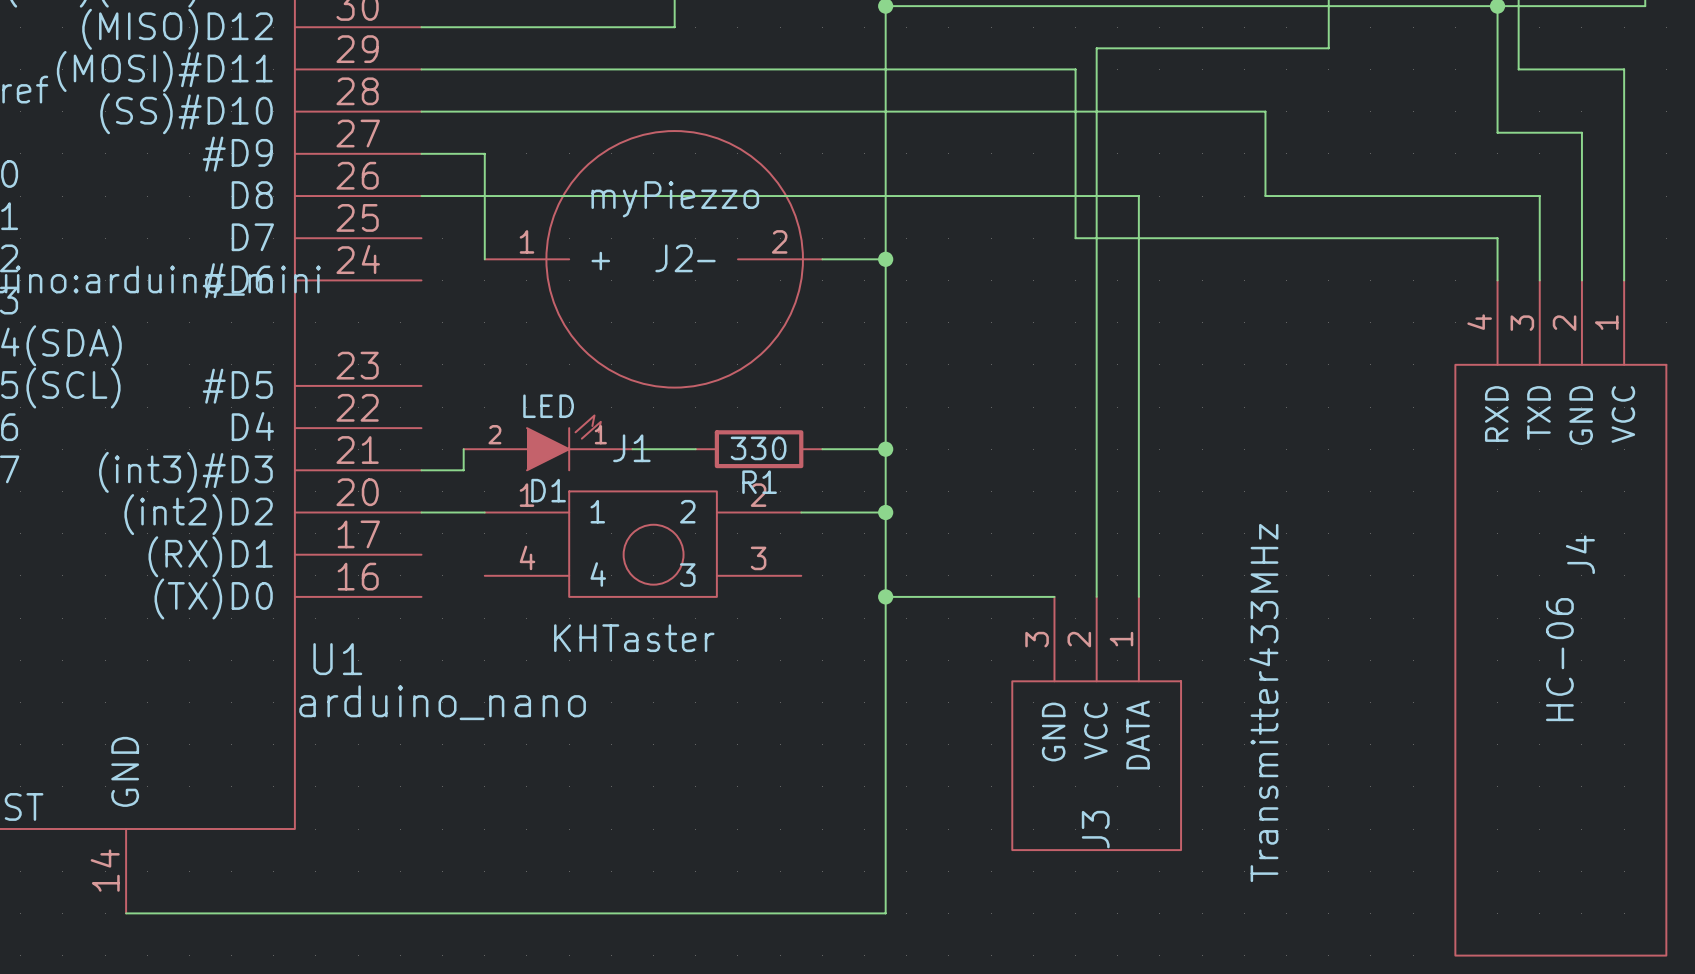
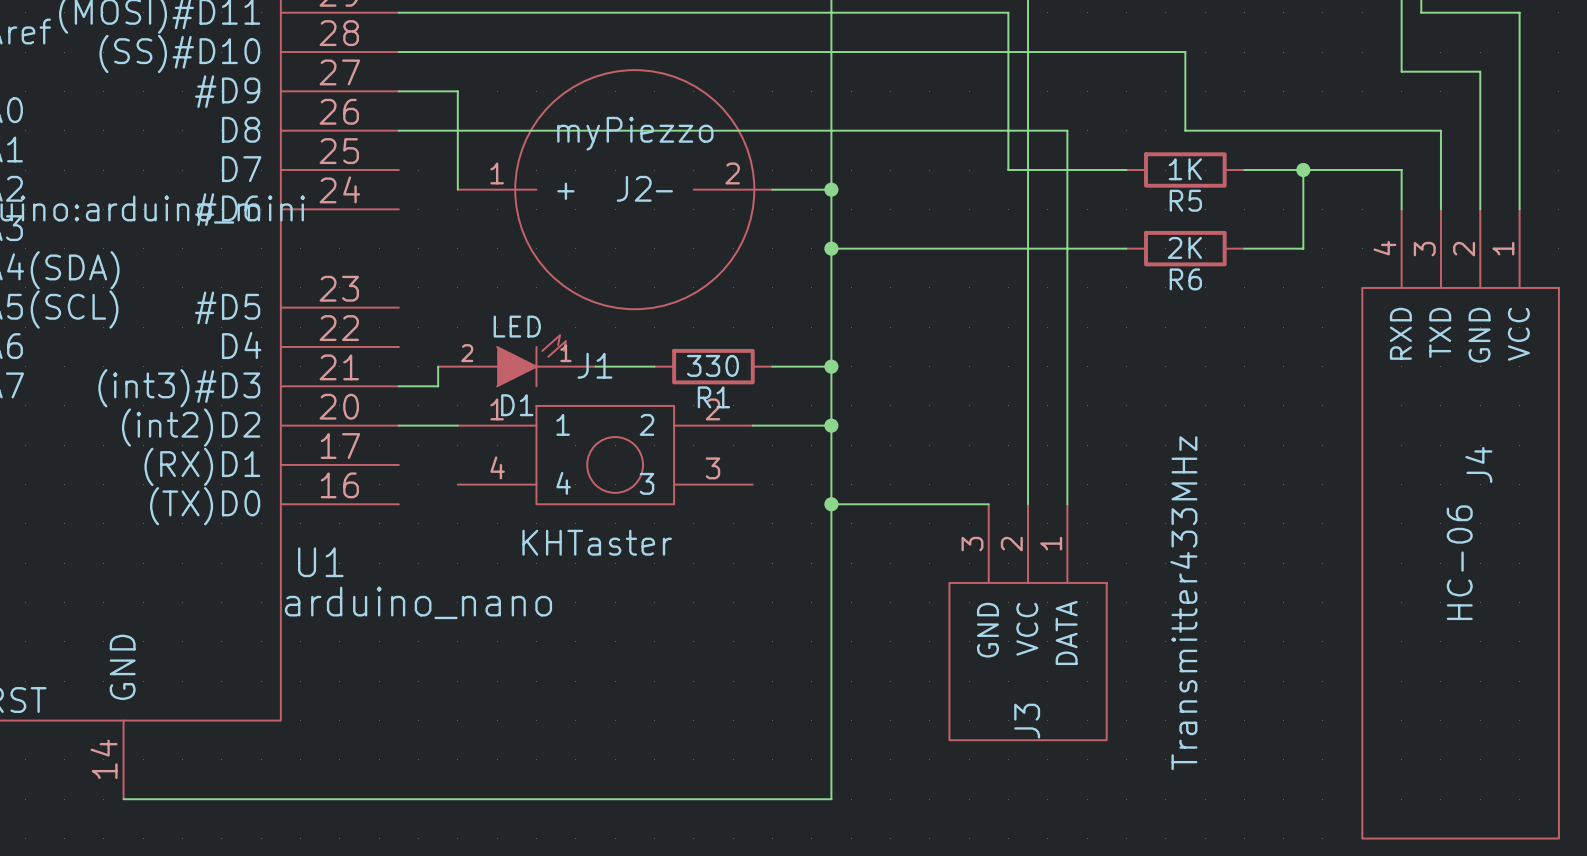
wire: (1202, 238) (1328, 238) -> none
R5: none -> 1K (1185, 170)
wire: none -> (1303, 170) (1303, 248) (1244, 248)
junction: none -> (1303, 170)
wire: none -> (831, 248) (1126, 248)
junction: none -> (831, 248)
R6: none -> 2K (1185, 248)

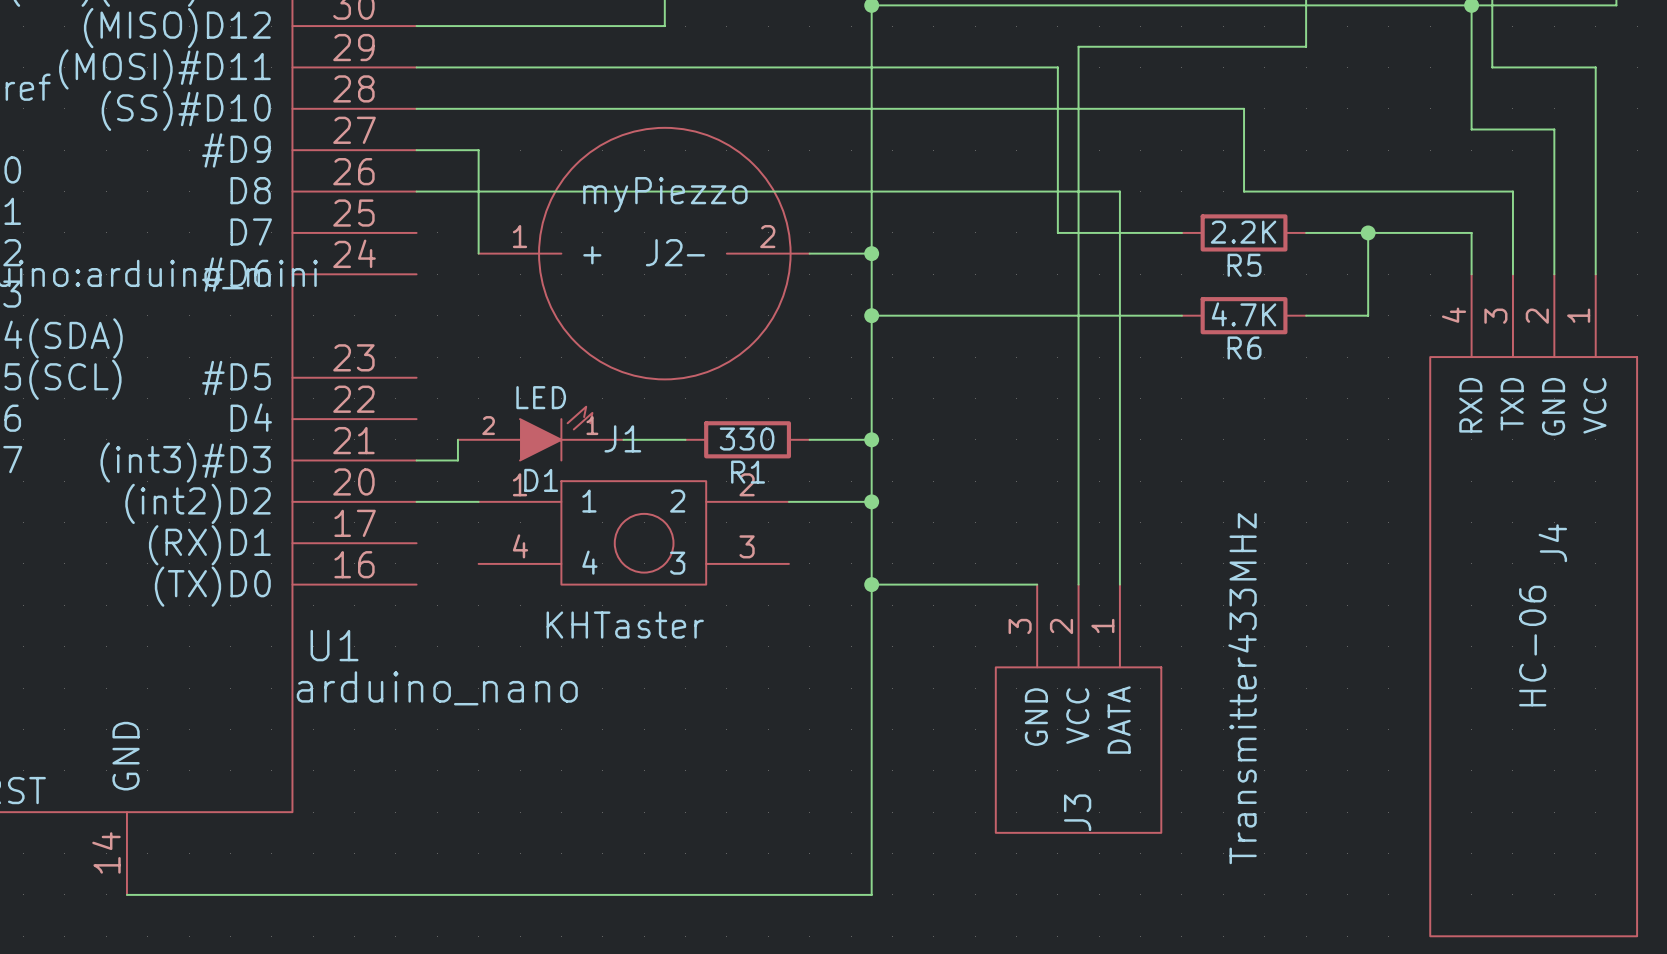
R5 value: 1K (1185, 169) -> 2.2K (1243, 232)
R6 value: 2K (1184, 247) -> 4.7K (1244, 314)

